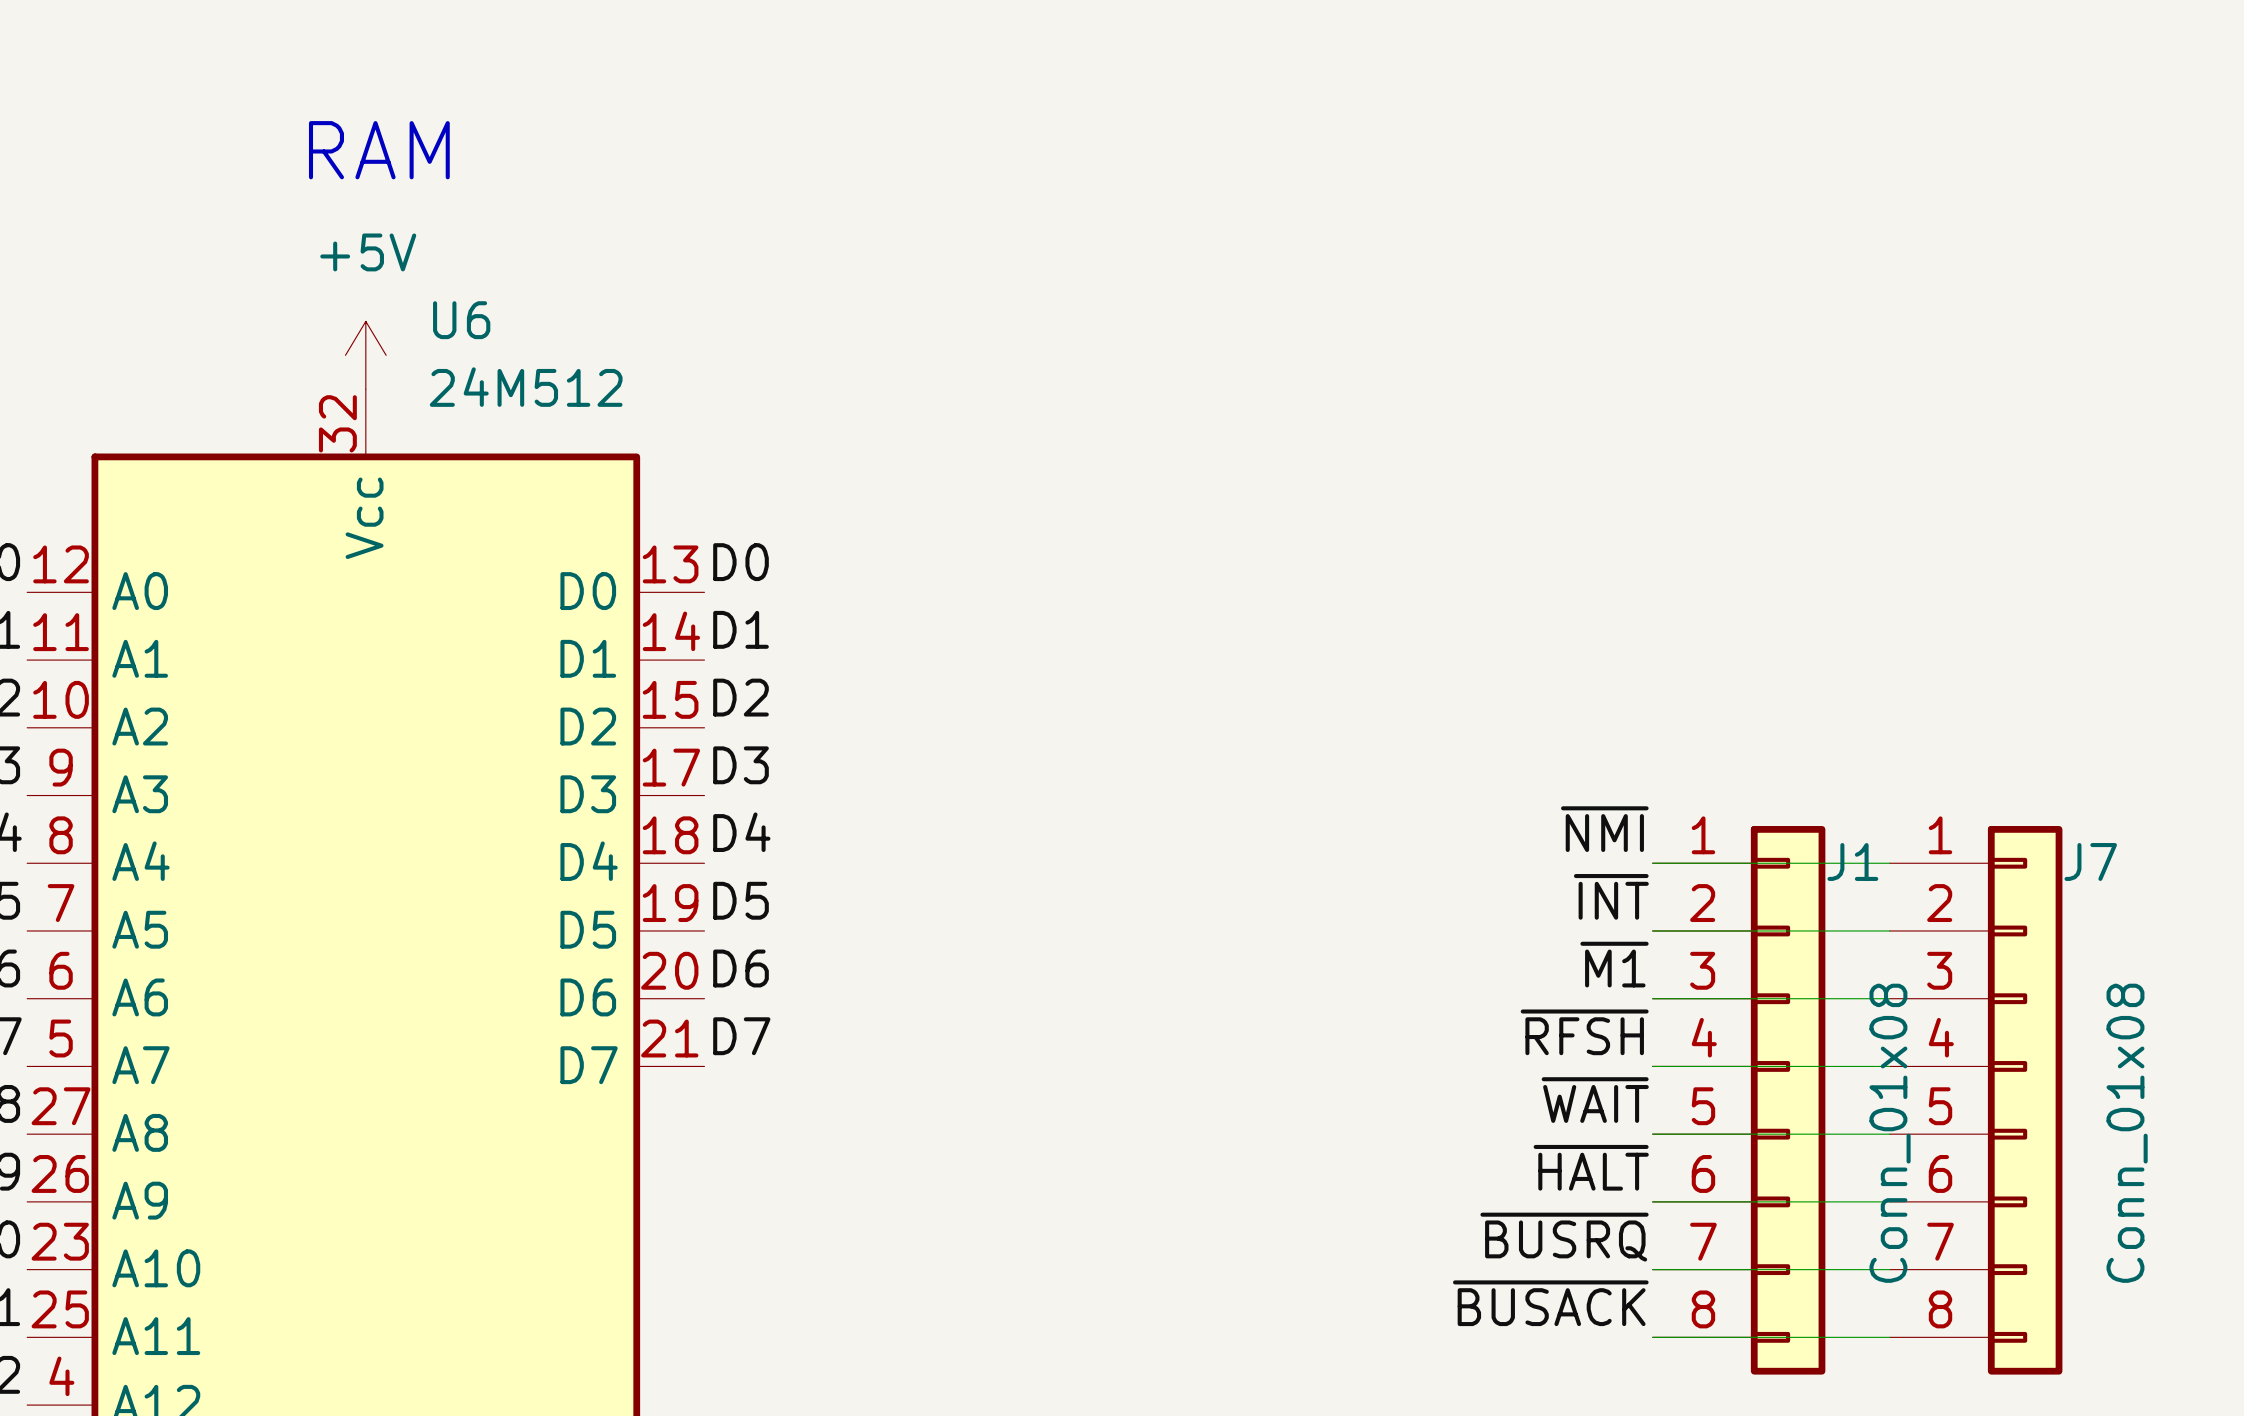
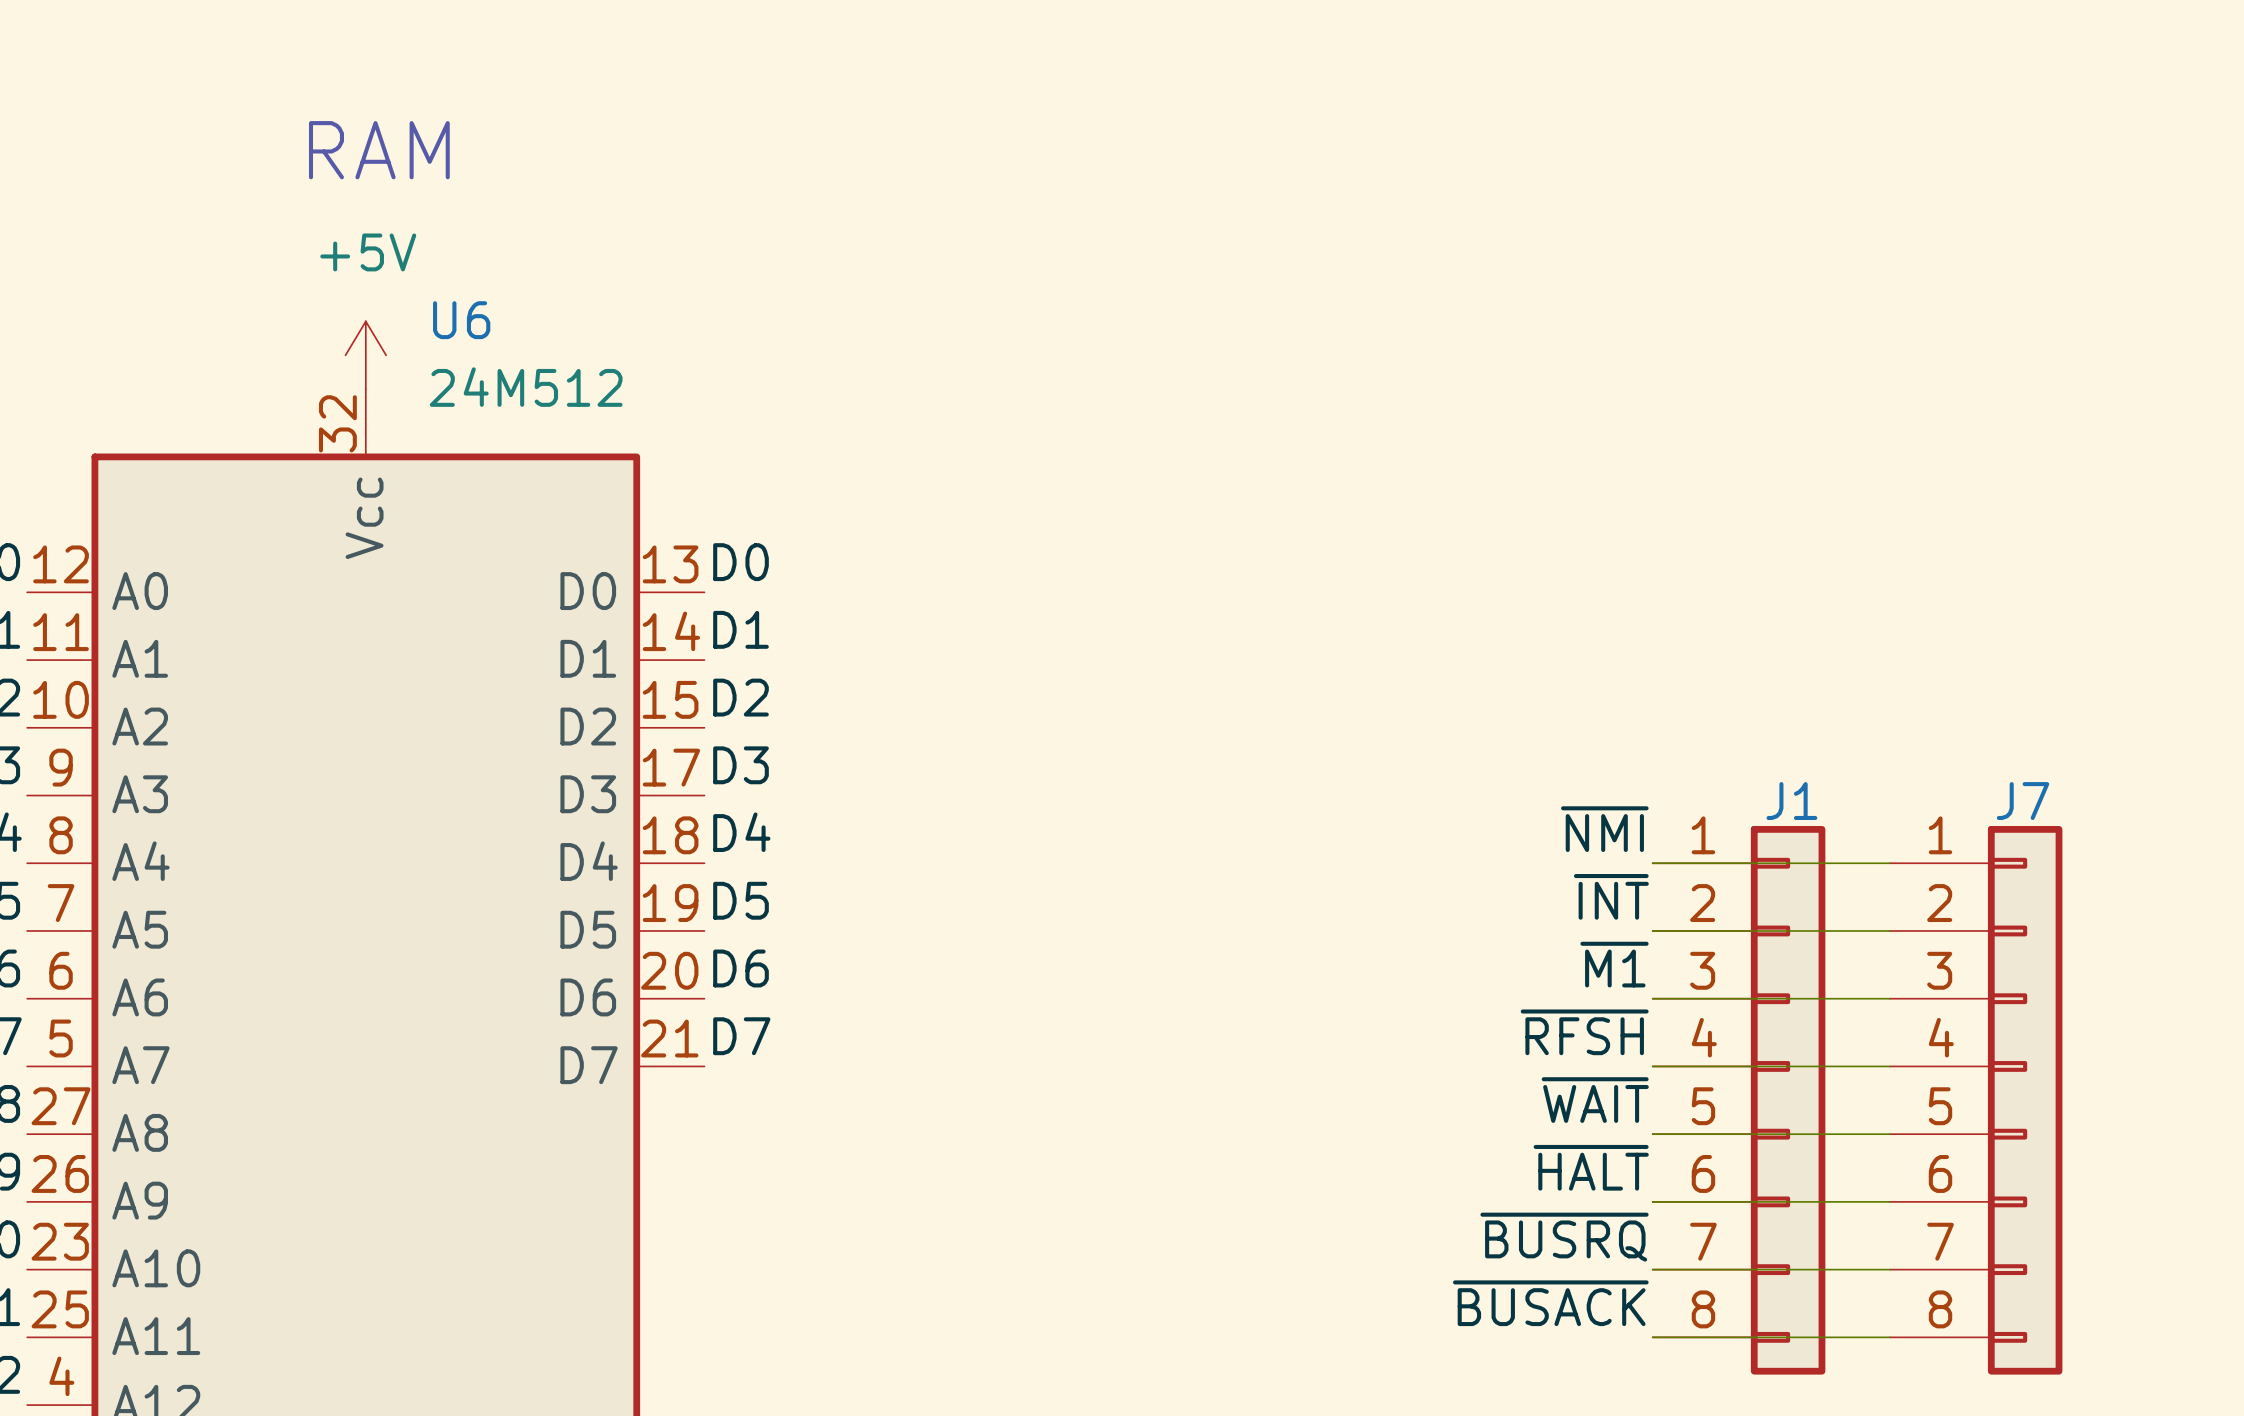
J1 name position: J1 (1852, 861) -> J1 (1791, 801)
J7 name position: J7 (2090, 861) -> J7 (2022, 801)
J1 value: Conn_01x08 (1890, 1133) -> none
J7 value: Conn_01x08 (2127, 1133) -> none

